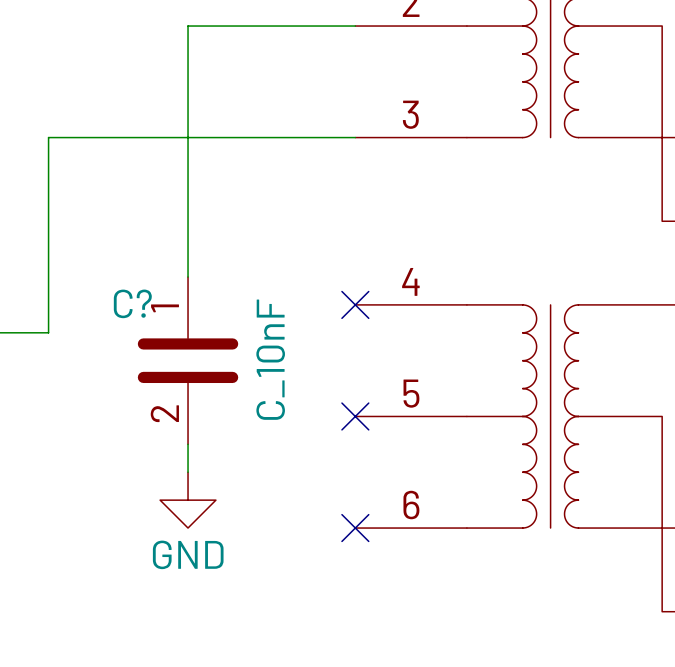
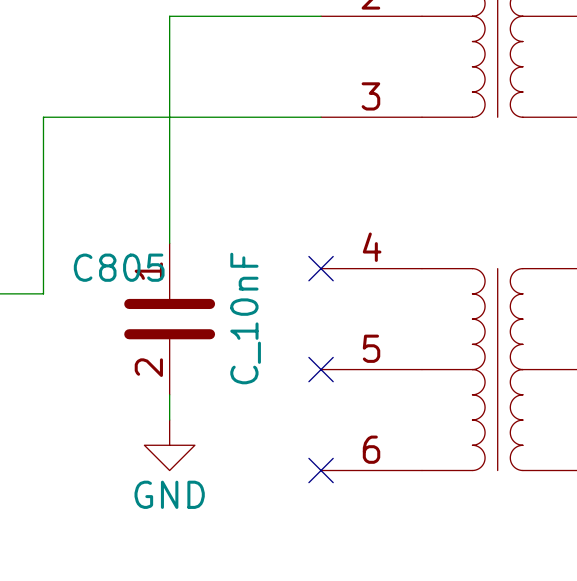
C? name: C? (132, 303) -> C805 (119, 267)

